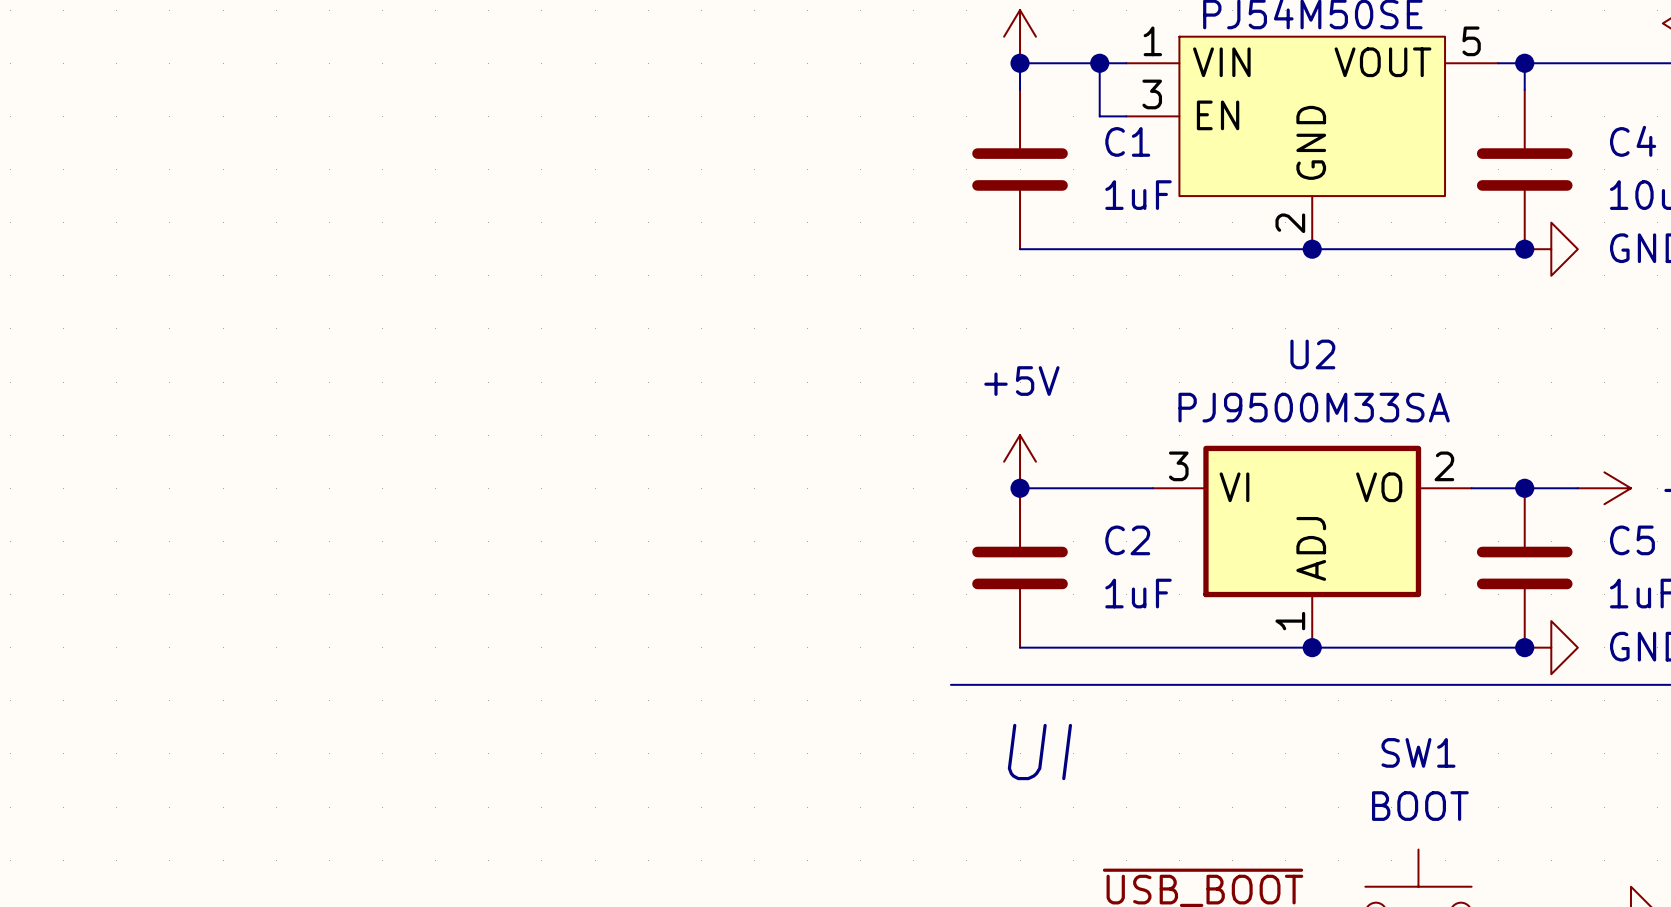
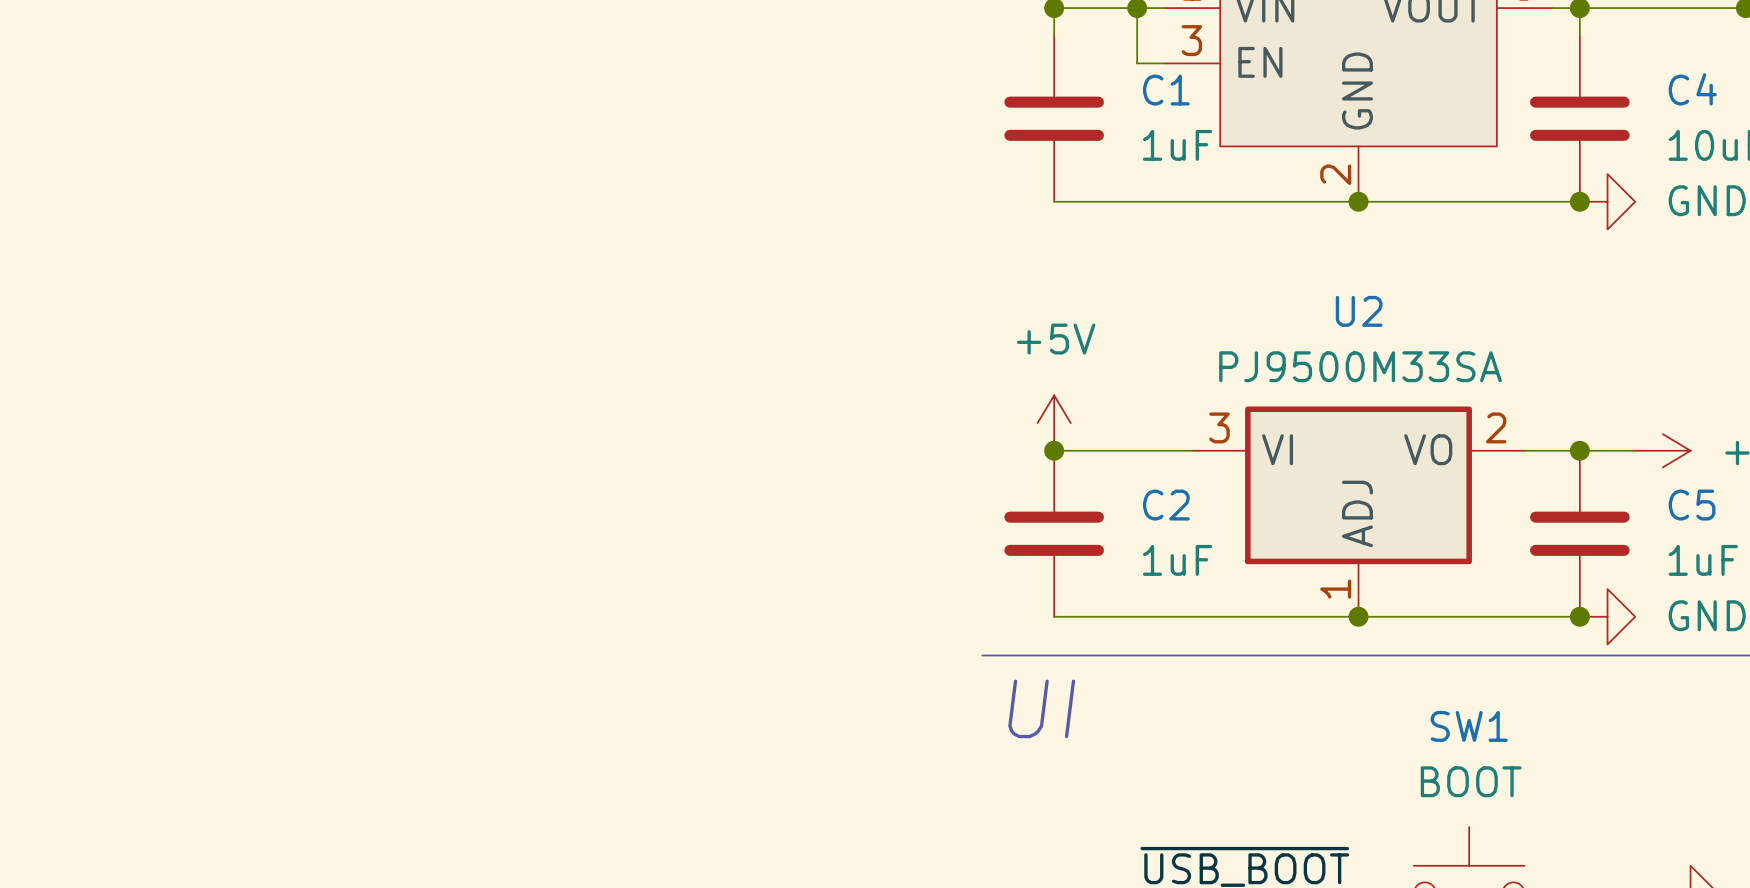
text position: UI (1039, 752) -> UI (1041, 708)

